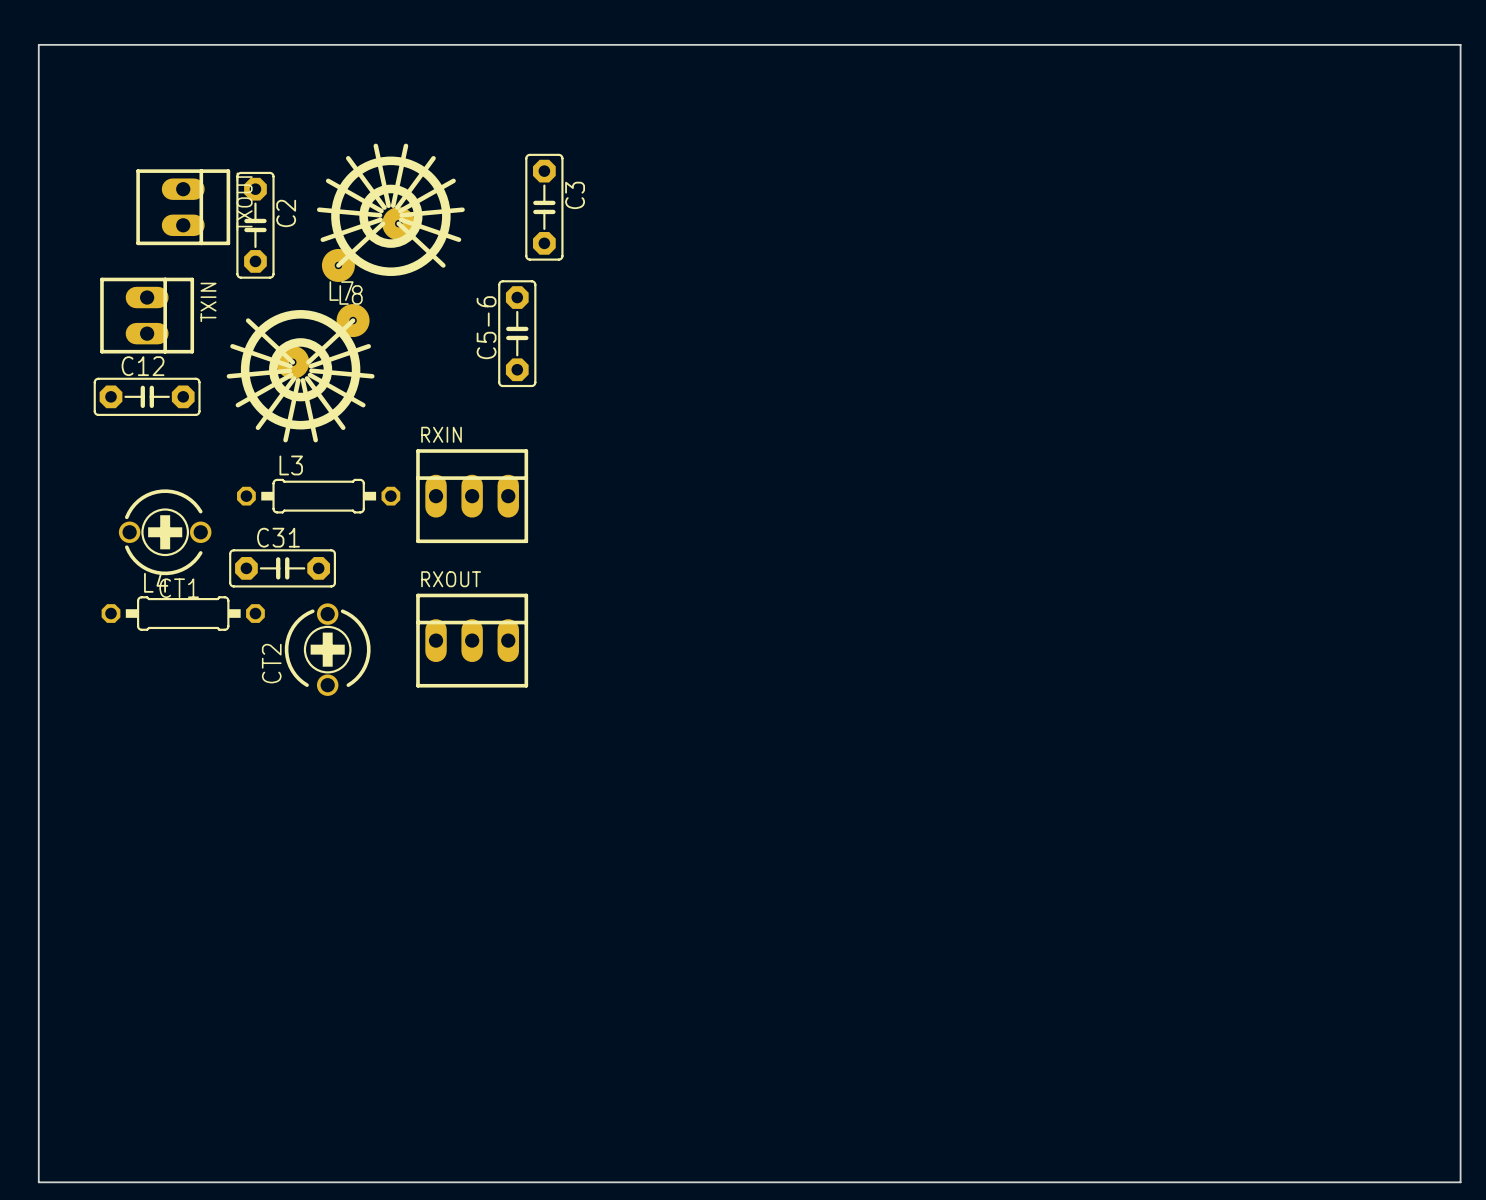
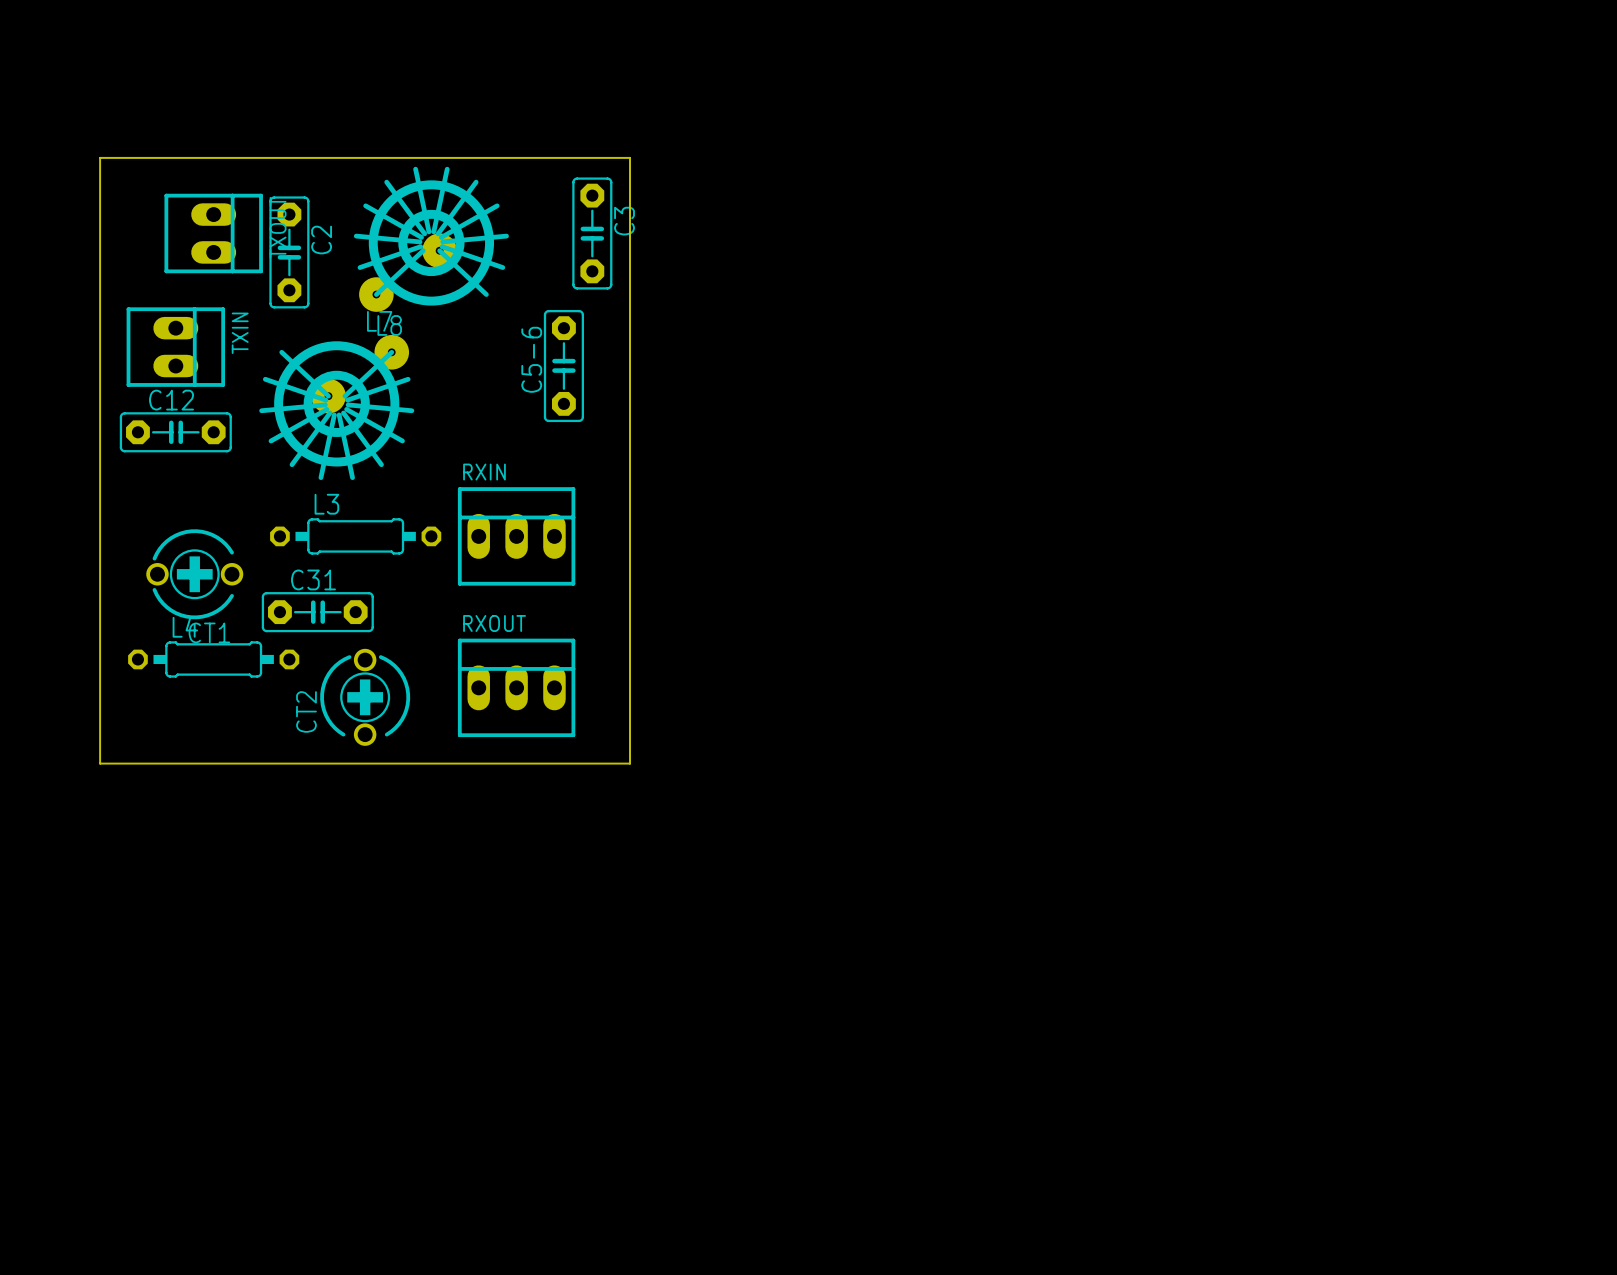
board edge: (38, 44) (1460, 44) (1460, 1182) (38, 1182) (38, 44) -> none
board edge: none -> (100, 157) (630, 157) (630, 763) (100, 763) (100, 157)

